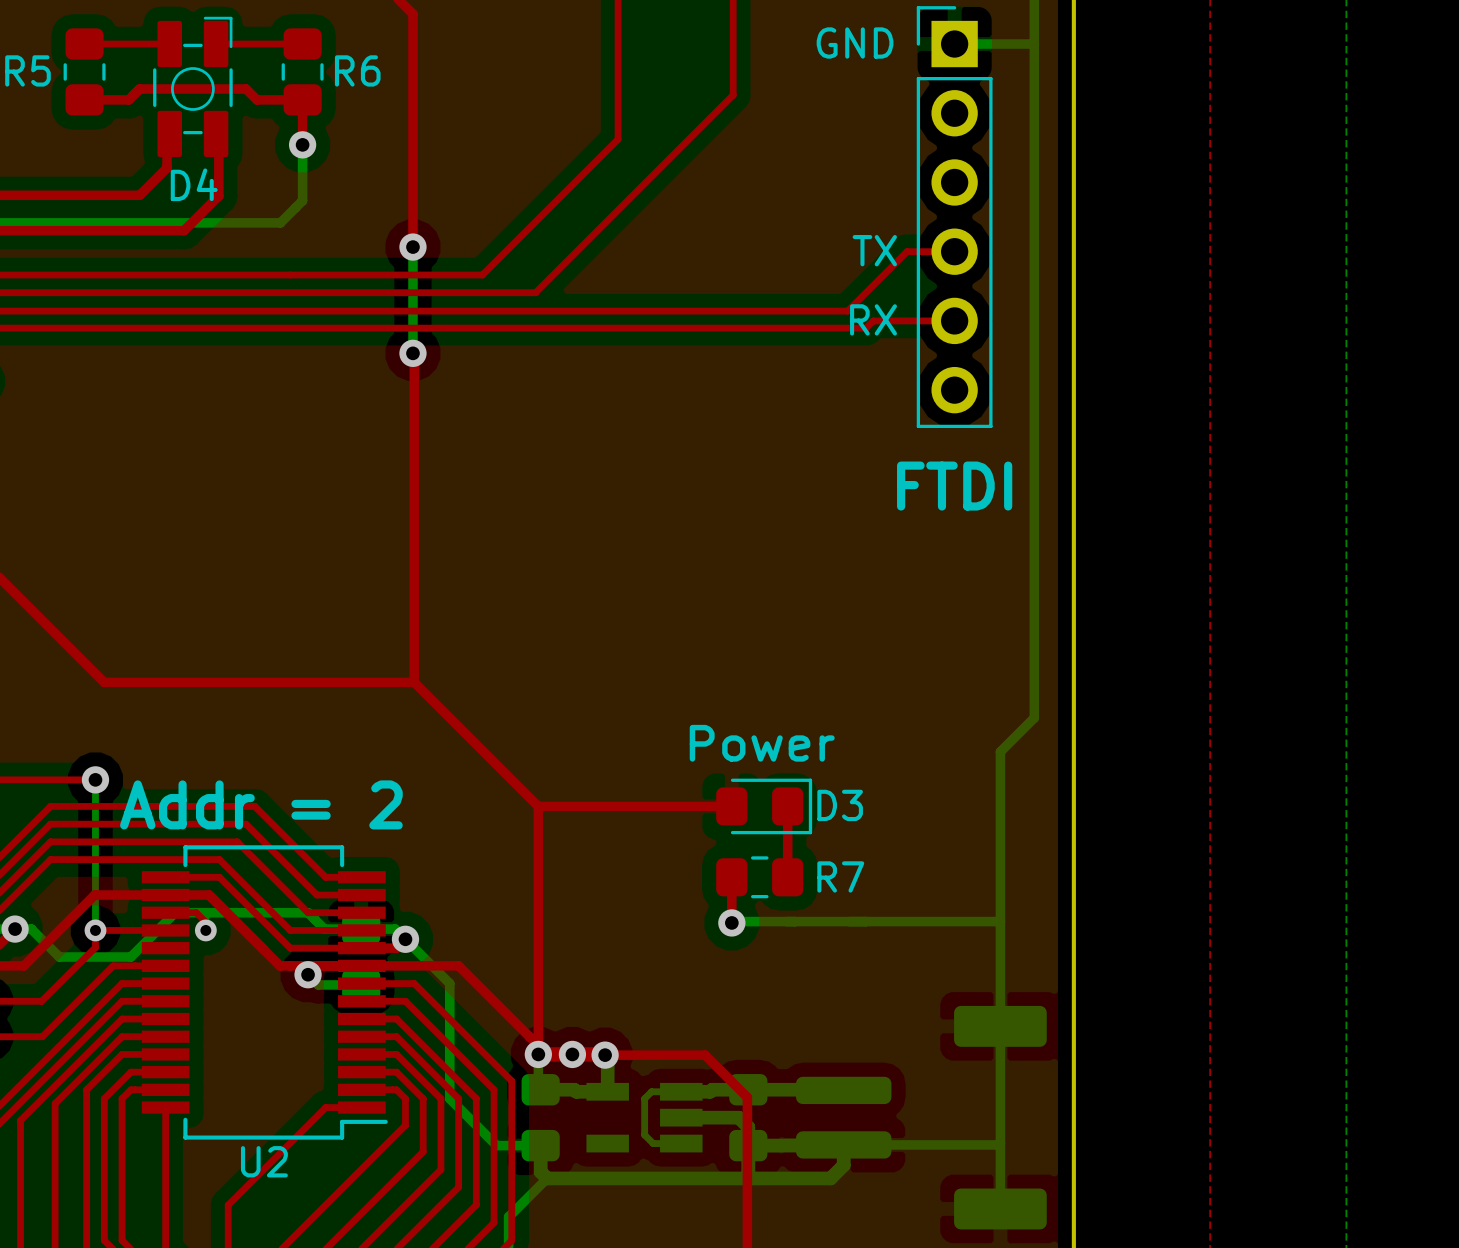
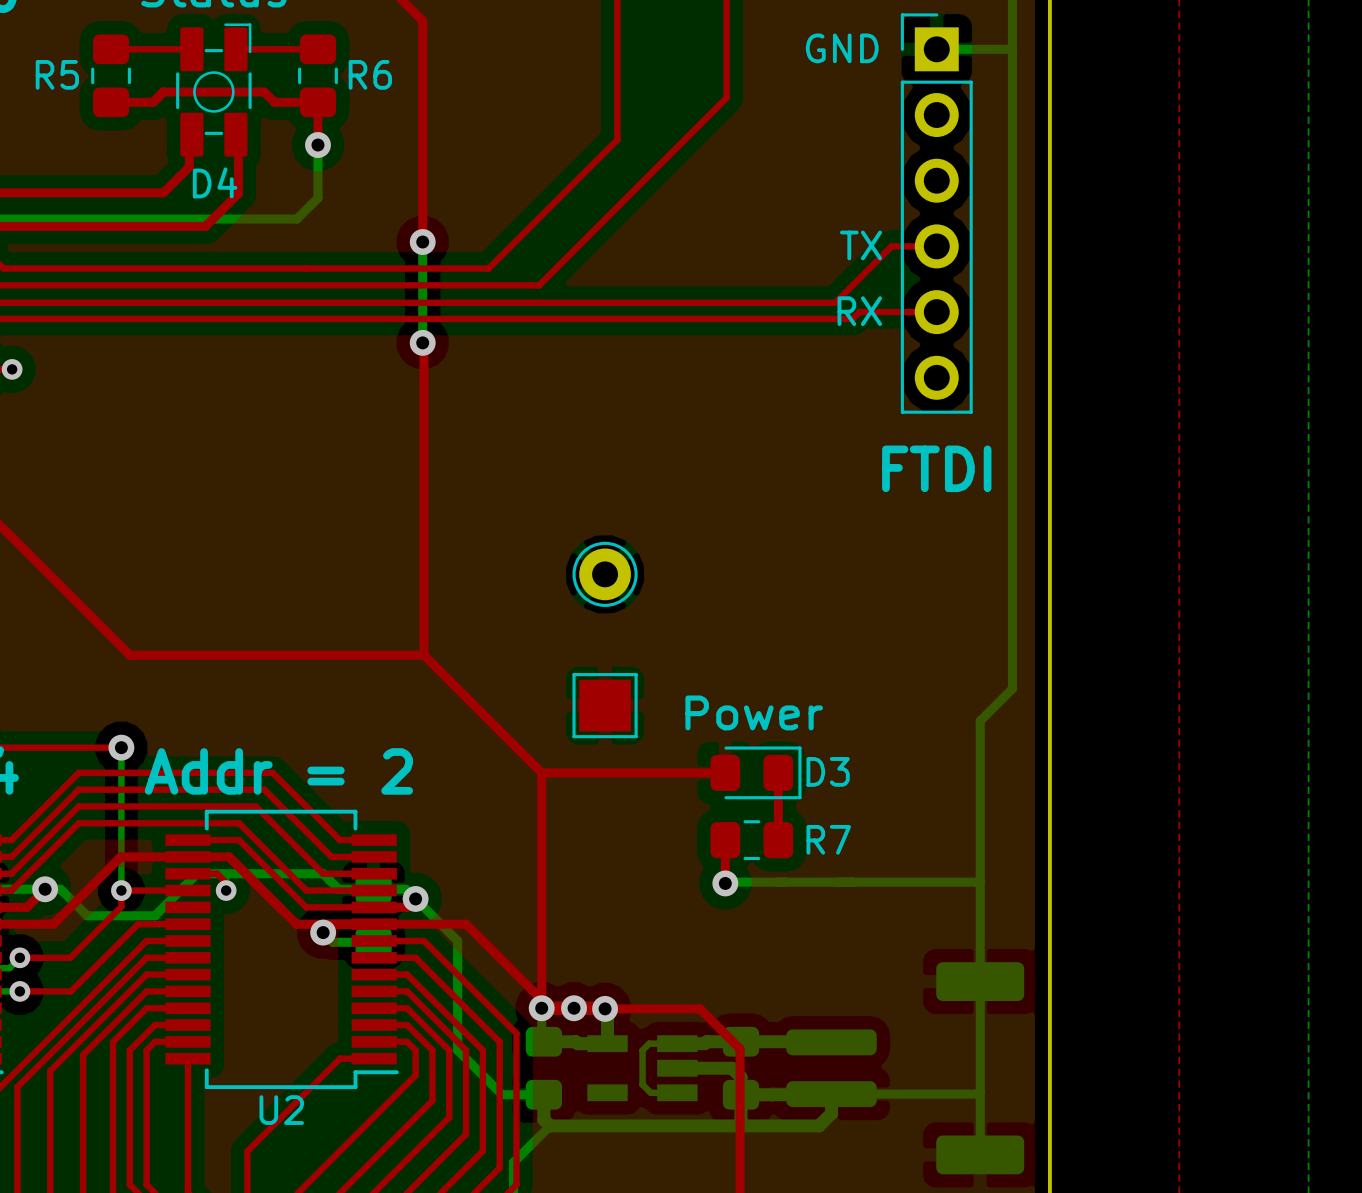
part: none -> (605, 574)
part: none -> (605, 705)

